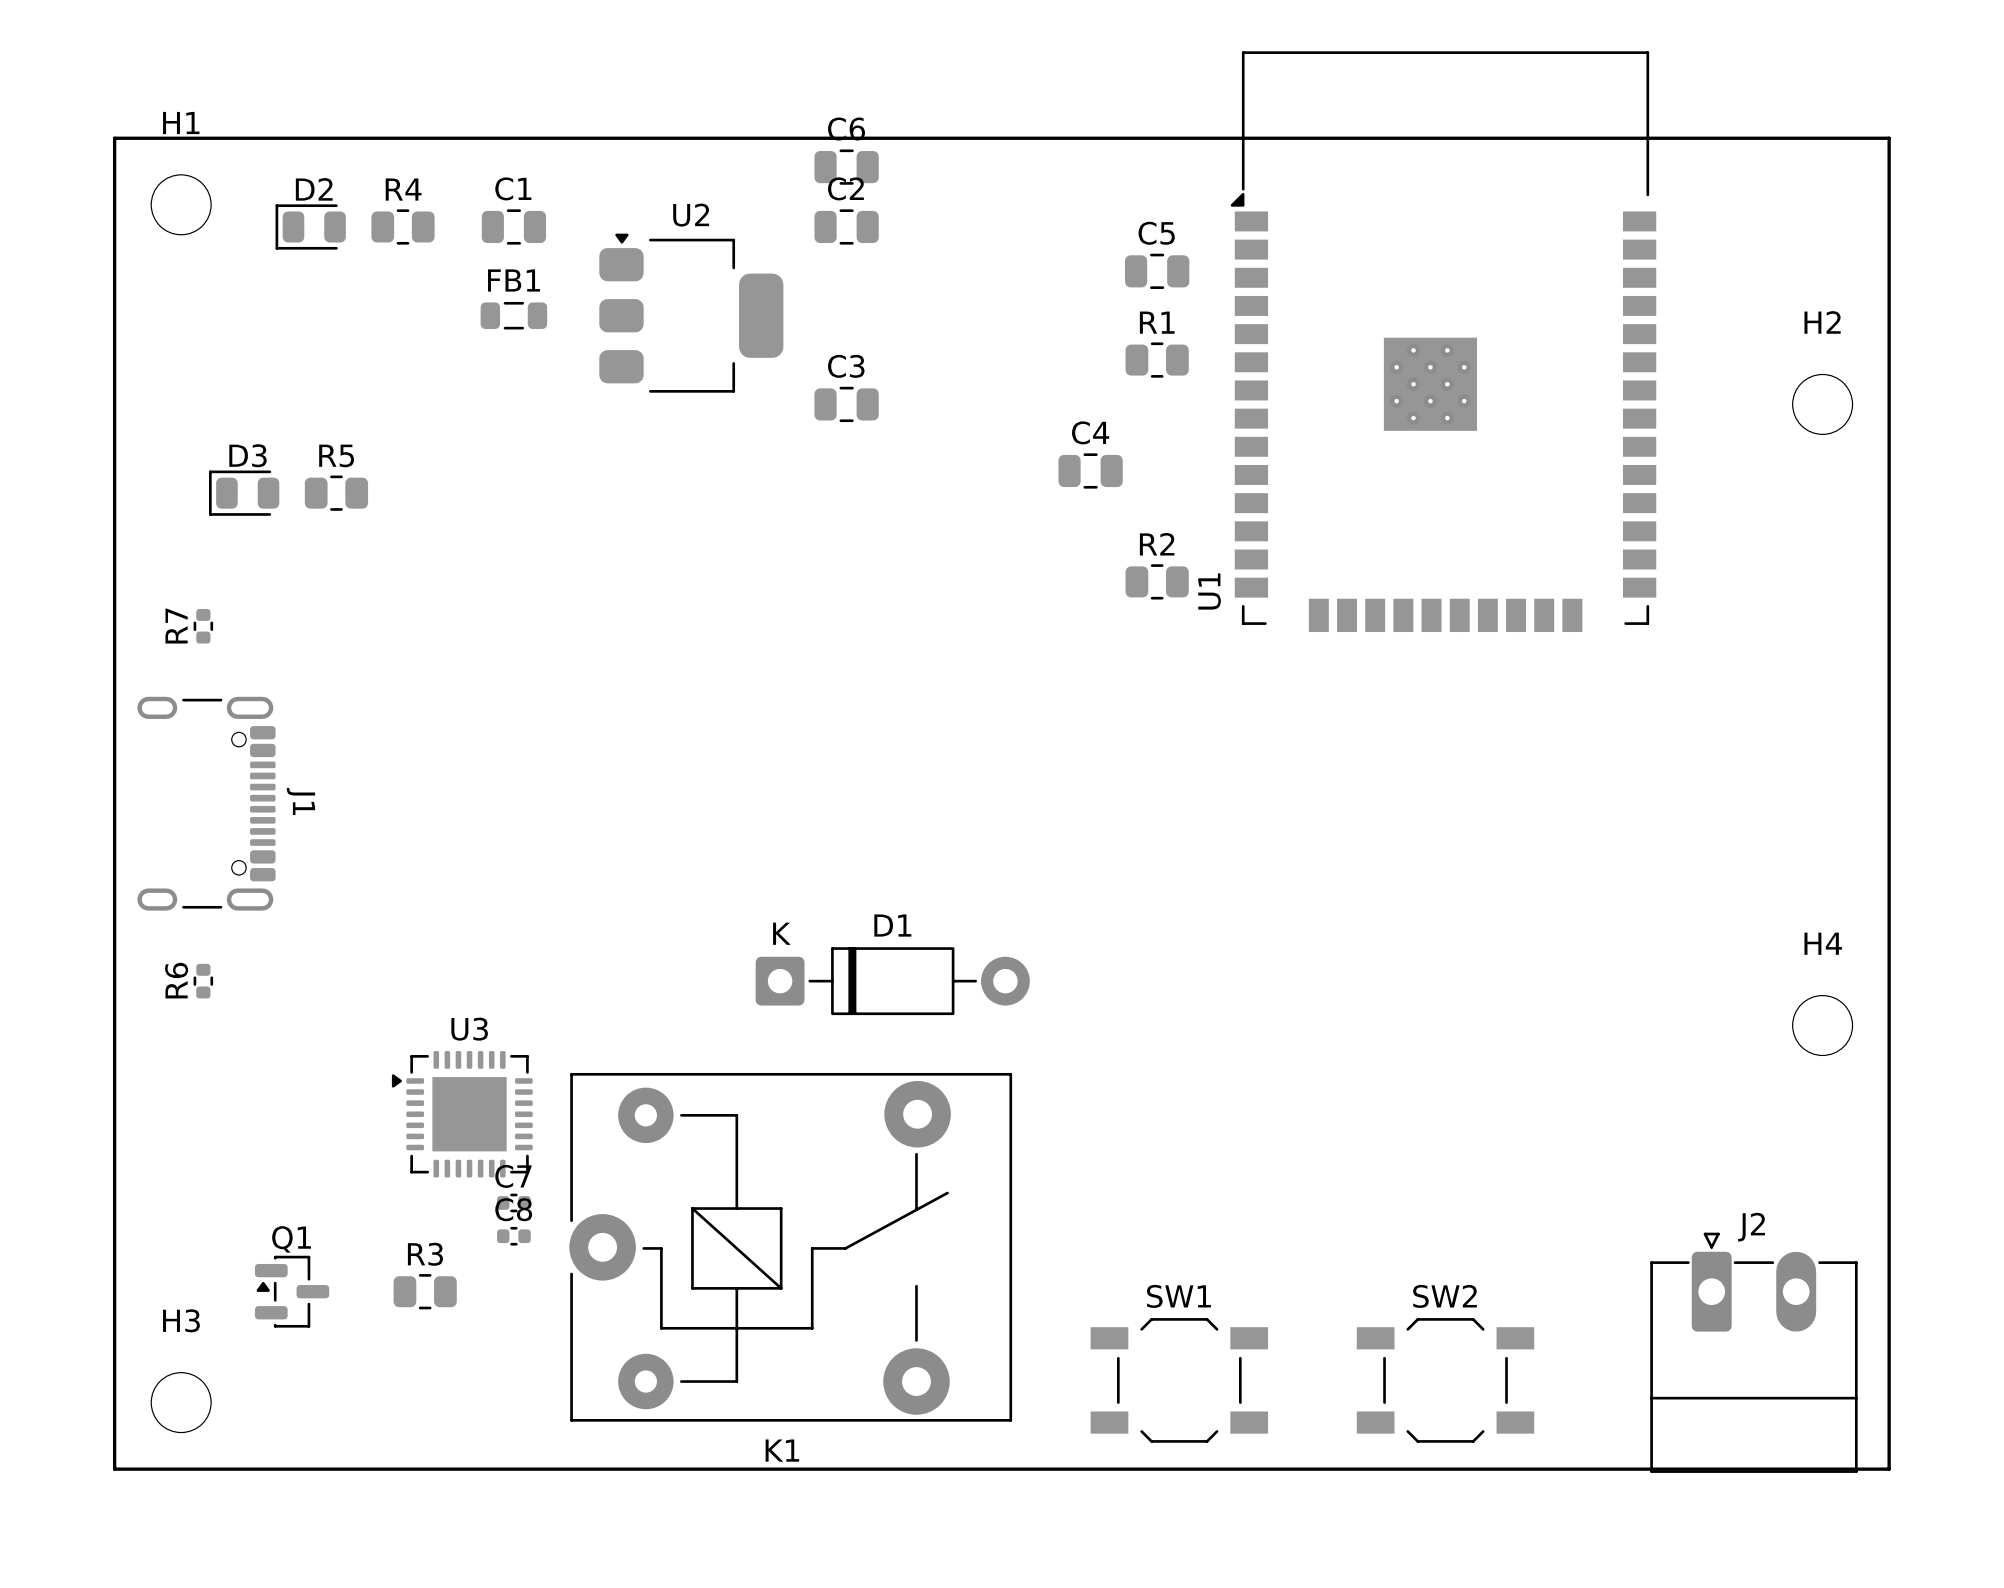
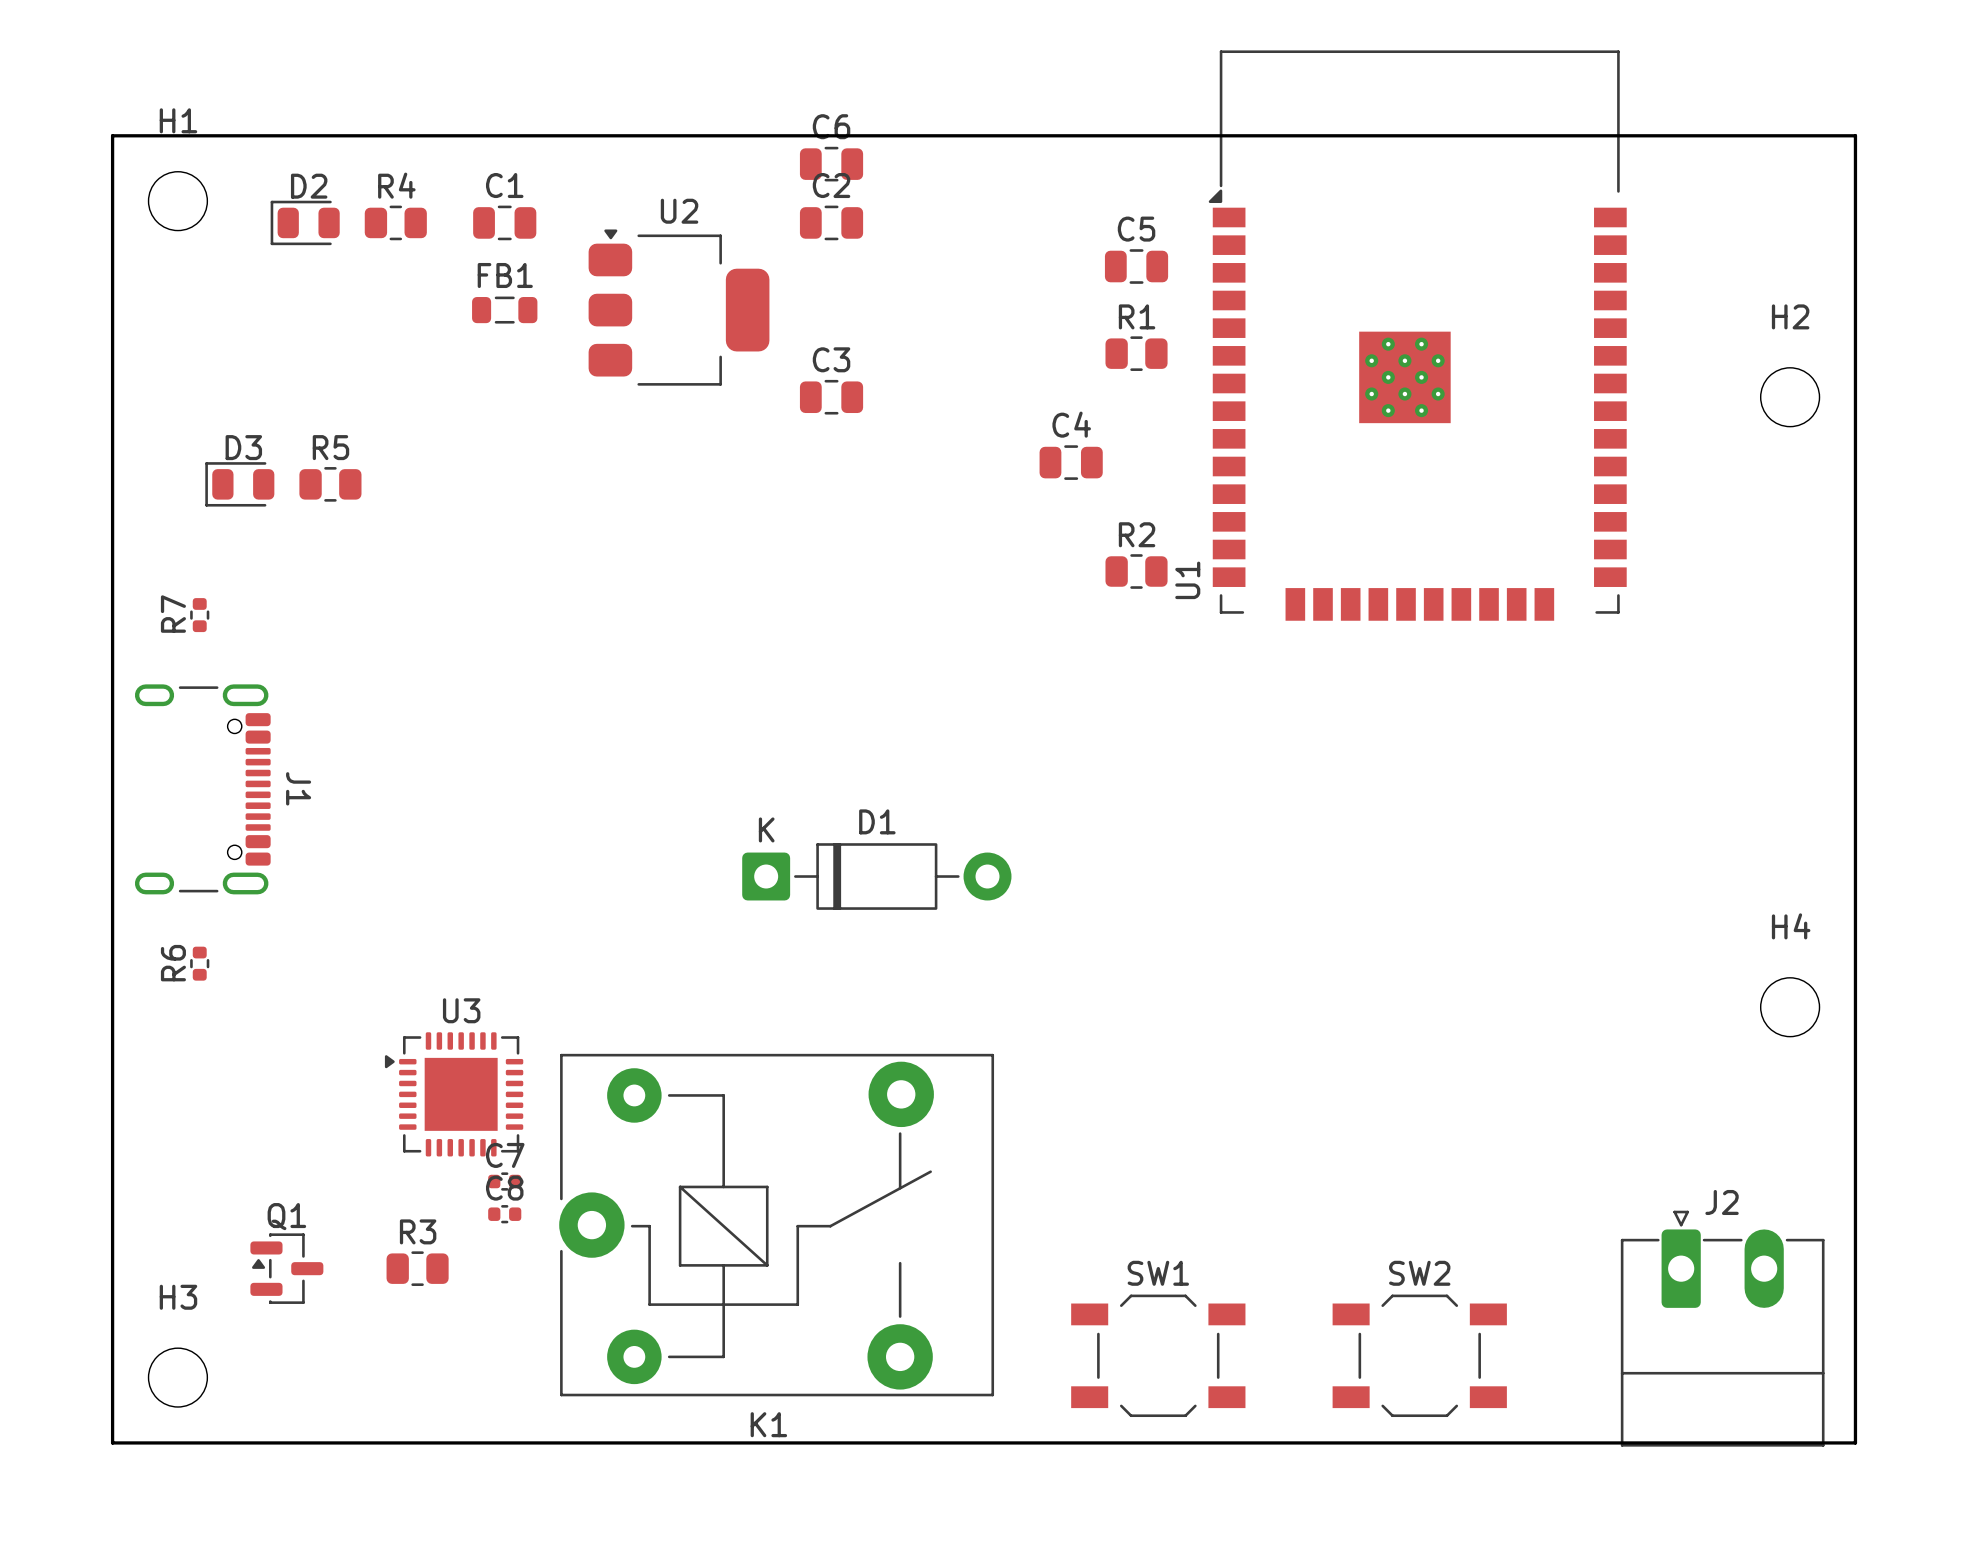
D1 position: (892, 981) -> (876, 876)

